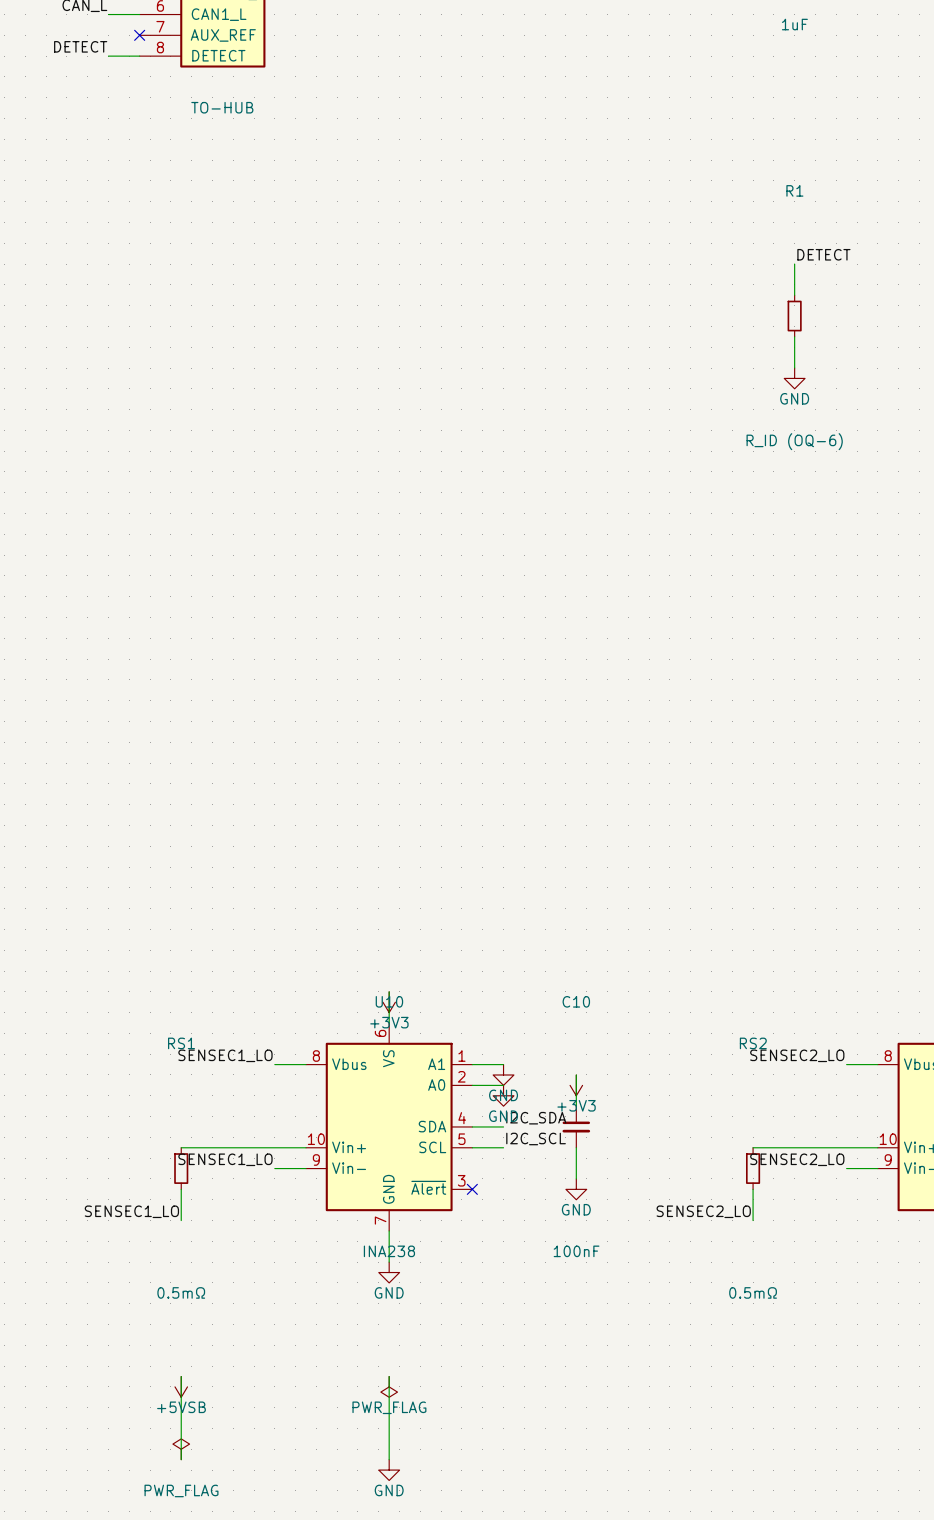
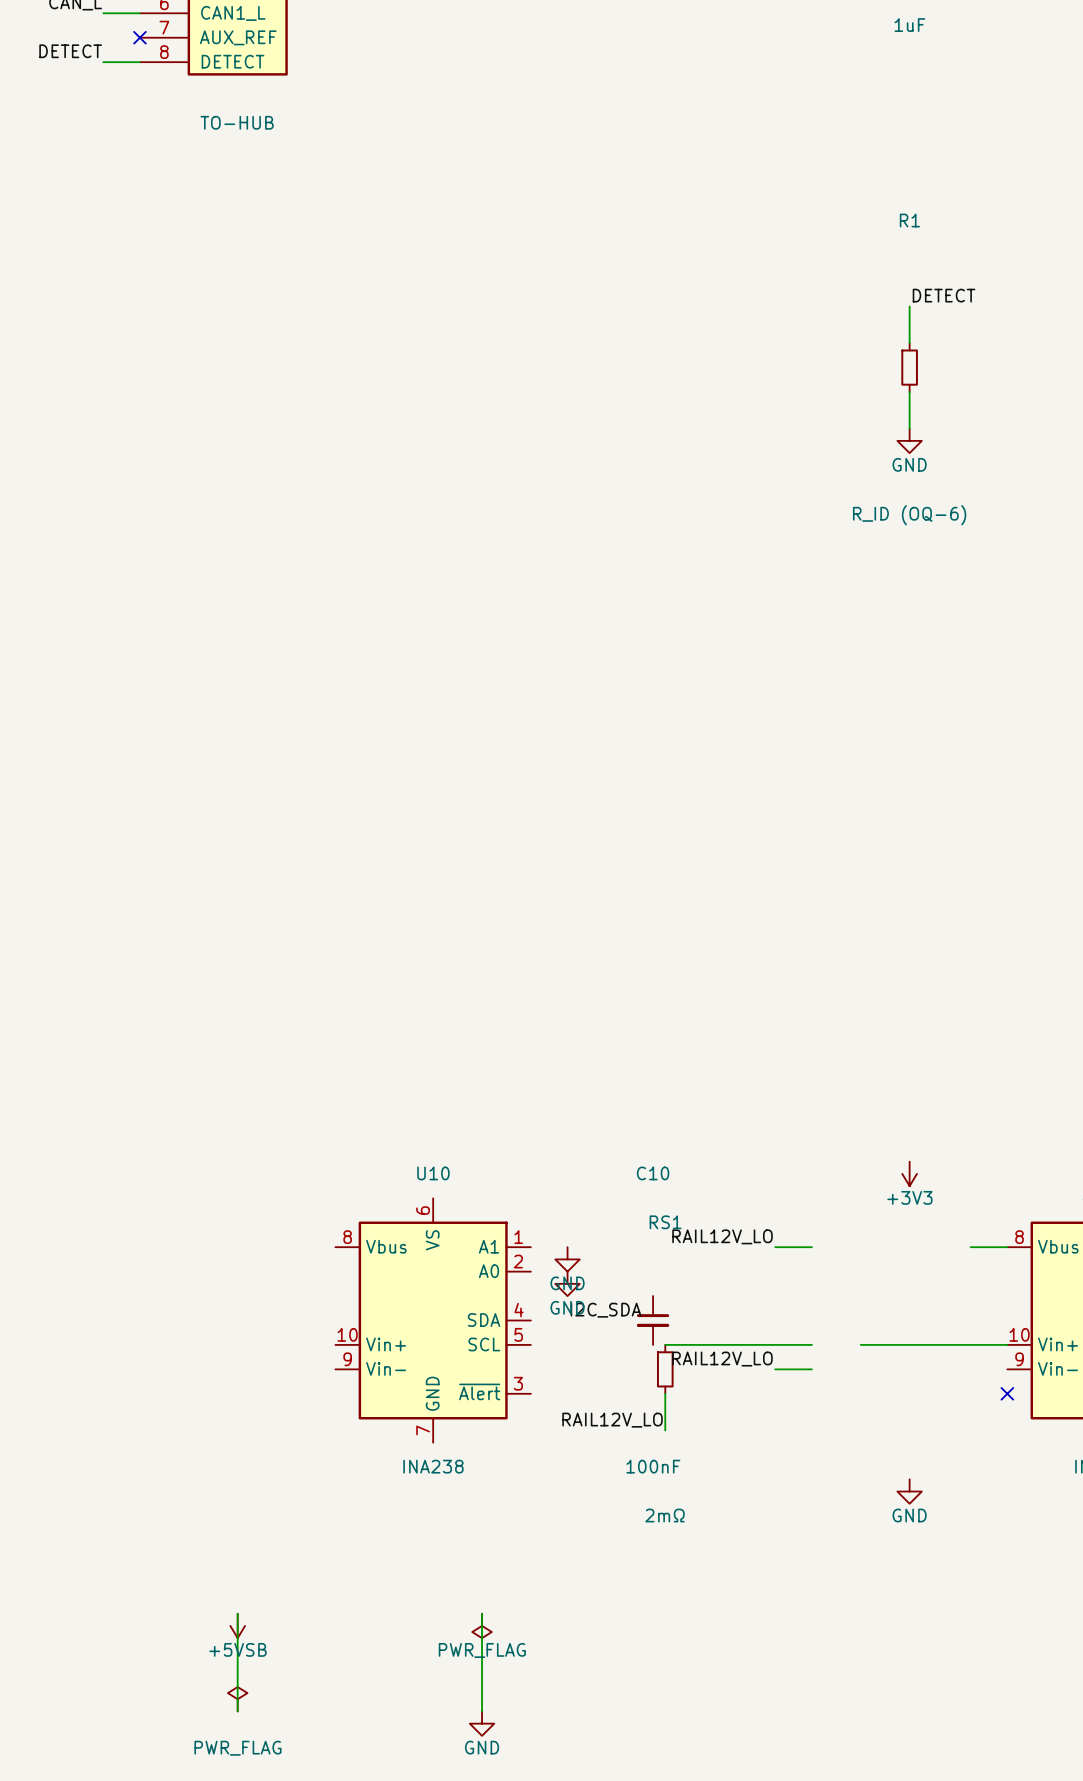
wire: (389, 991) (389, 1023) -> none
power symbol: +3V3 (389, 1002) -> none
power symbol: none -> +3V3 (909, 1173)
label: SENSEC1_LO (225, 1055) -> none
label: none -> RAIL12V_LO (722, 1236)
label: SENSEC2_LO (797, 1055) -> none
wire: (274, 1064) (306, 1064) -> none
wire: (472, 1064) (503, 1064) -> none
wire: none -> (775, 1247) (811, 1247)
wire: (576, 1074) (576, 1106) -> none
wire: (472, 1085) (503, 1085) -> none
power symbol: +3V3 (576, 1085) -> none
wire: (472, 1126) (503, 1126) -> none
label: I2C_SCL (536, 1138) -> none
wire: (181, 1147) (306, 1147) -> none
wire: (472, 1147) (503, 1147) -> none
wire: (576, 1147) (576, 1178) -> none
wire: none -> (665, 1344) (811, 1344)
label: SENSEC1_LO (225, 1159) -> none
label: none -> RAIL12V_LO (722, 1359)
label: SENSEC2_LO (797, 1159) -> none
RS1 position: (181, 1168) -> (665, 1369)
wire: (274, 1168) (306, 1168) -> none
RS2: 0.5mΩ (753, 1168) -> none
wire: (846, 1168) (877, 1168) -> (775, 1369) (811, 1369)
wire: (181, 1189) (181, 1220) -> none
no-connect mark: (472, 1189) -> none
power symbol: GND (576, 1189) -> none
wire: (753, 1189) (753, 1220) -> (665, 1393) (665, 1430)
no-connect mark: none -> (1007, 1393)
label: SENSEC1_LO (131, 1211) -> none
label: none -> RAIL12V_LO (612, 1420)
label: SENSEC2_LO (703, 1211) -> none
wire: (389, 1230) (389, 1262) -> none
power symbol: GND (389, 1272) -> none
power symbol: none -> GND (909, 1491)
RS1 value: 0.5mΩ (181, 1292) -> 2mΩ (664, 1515)
wire: (181, 1376) (181, 1459) -> none
wire: (389, 1376) (389, 1459) -> (237, 1613) (237, 1711)
wire: none -> (482, 1613) (482, 1711)
power symbol position: +5VSB (181, 1386) -> +5VSB (237, 1625)
power symbol position: PWR_FLAG (389, 1386) -> PWR_FLAG (482, 1625)
power symbol position: PWR_FLAG (181, 1449) -> PWR_FLAG (237, 1699)
power symbol position: GND (389, 1470) -> GND (482, 1723)

